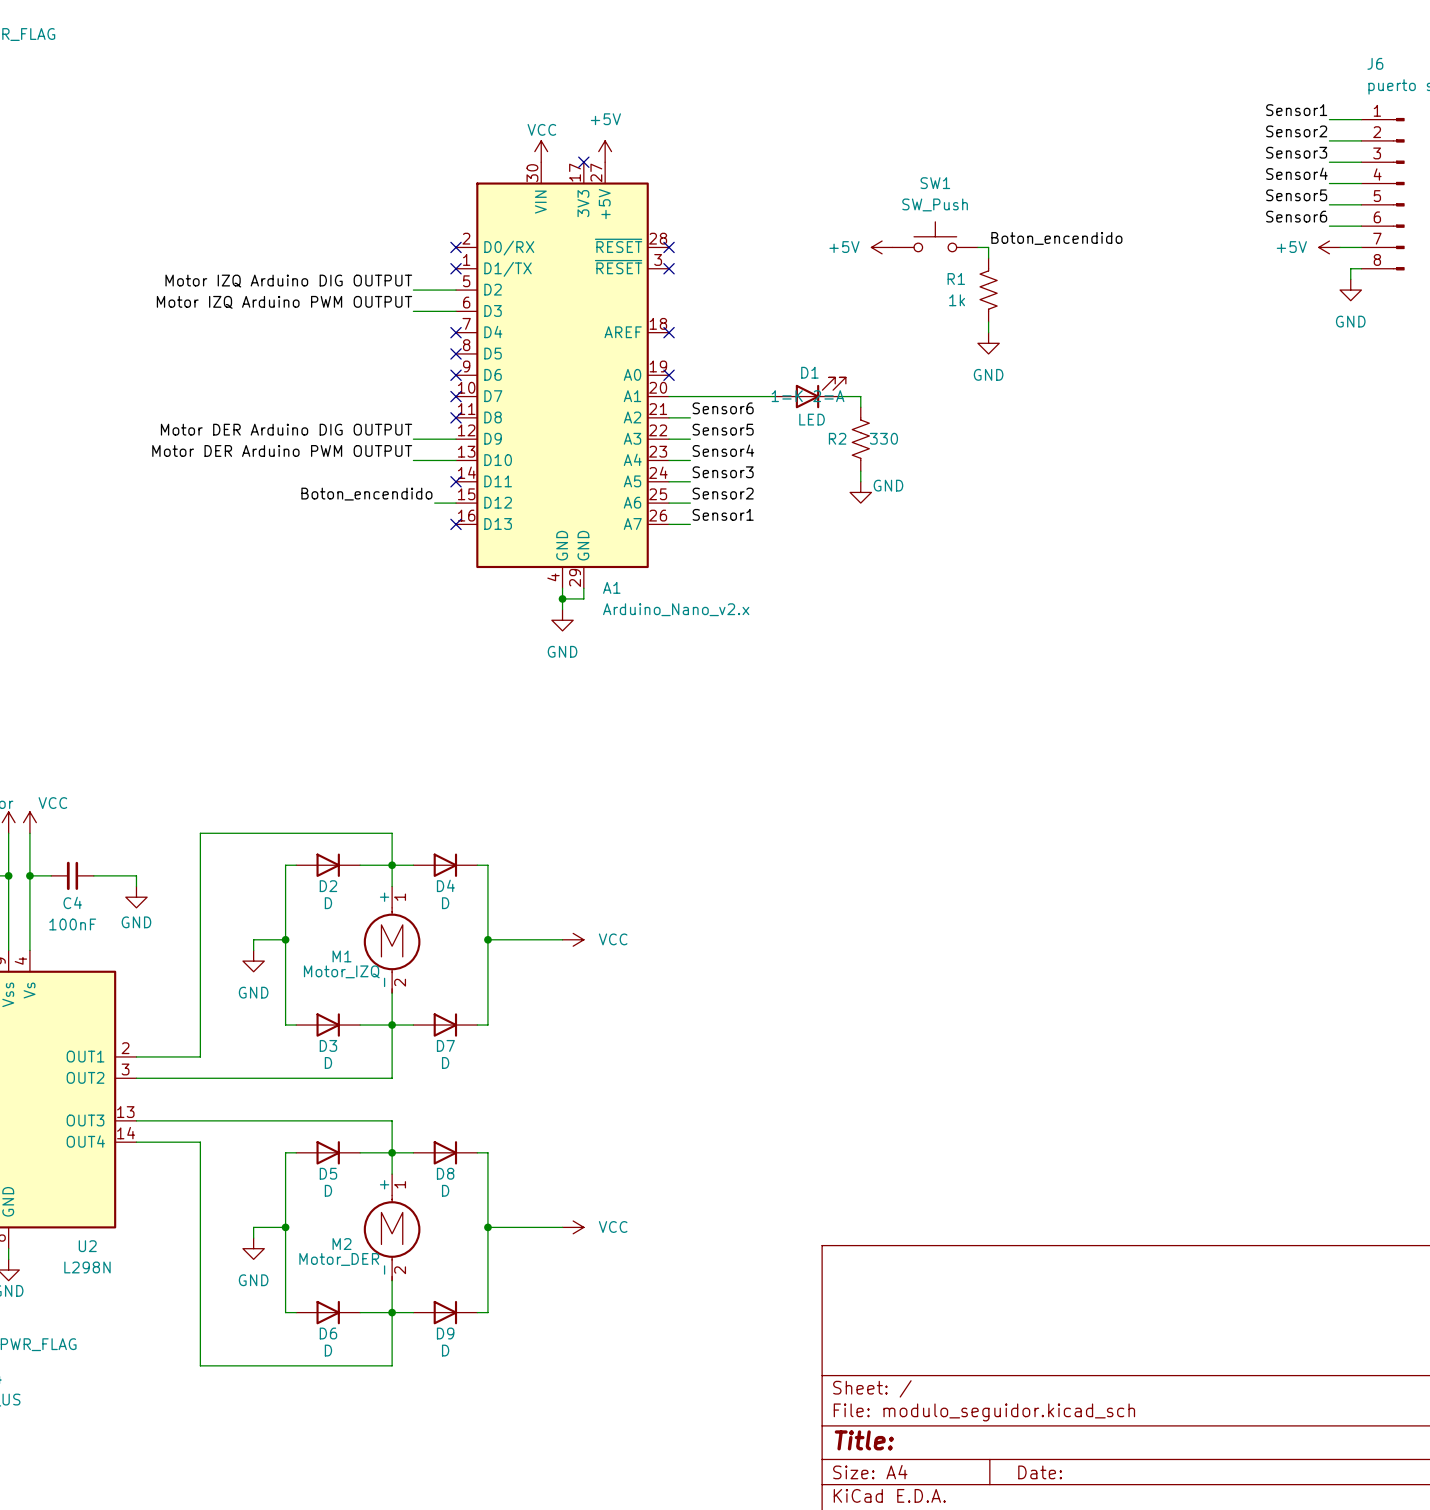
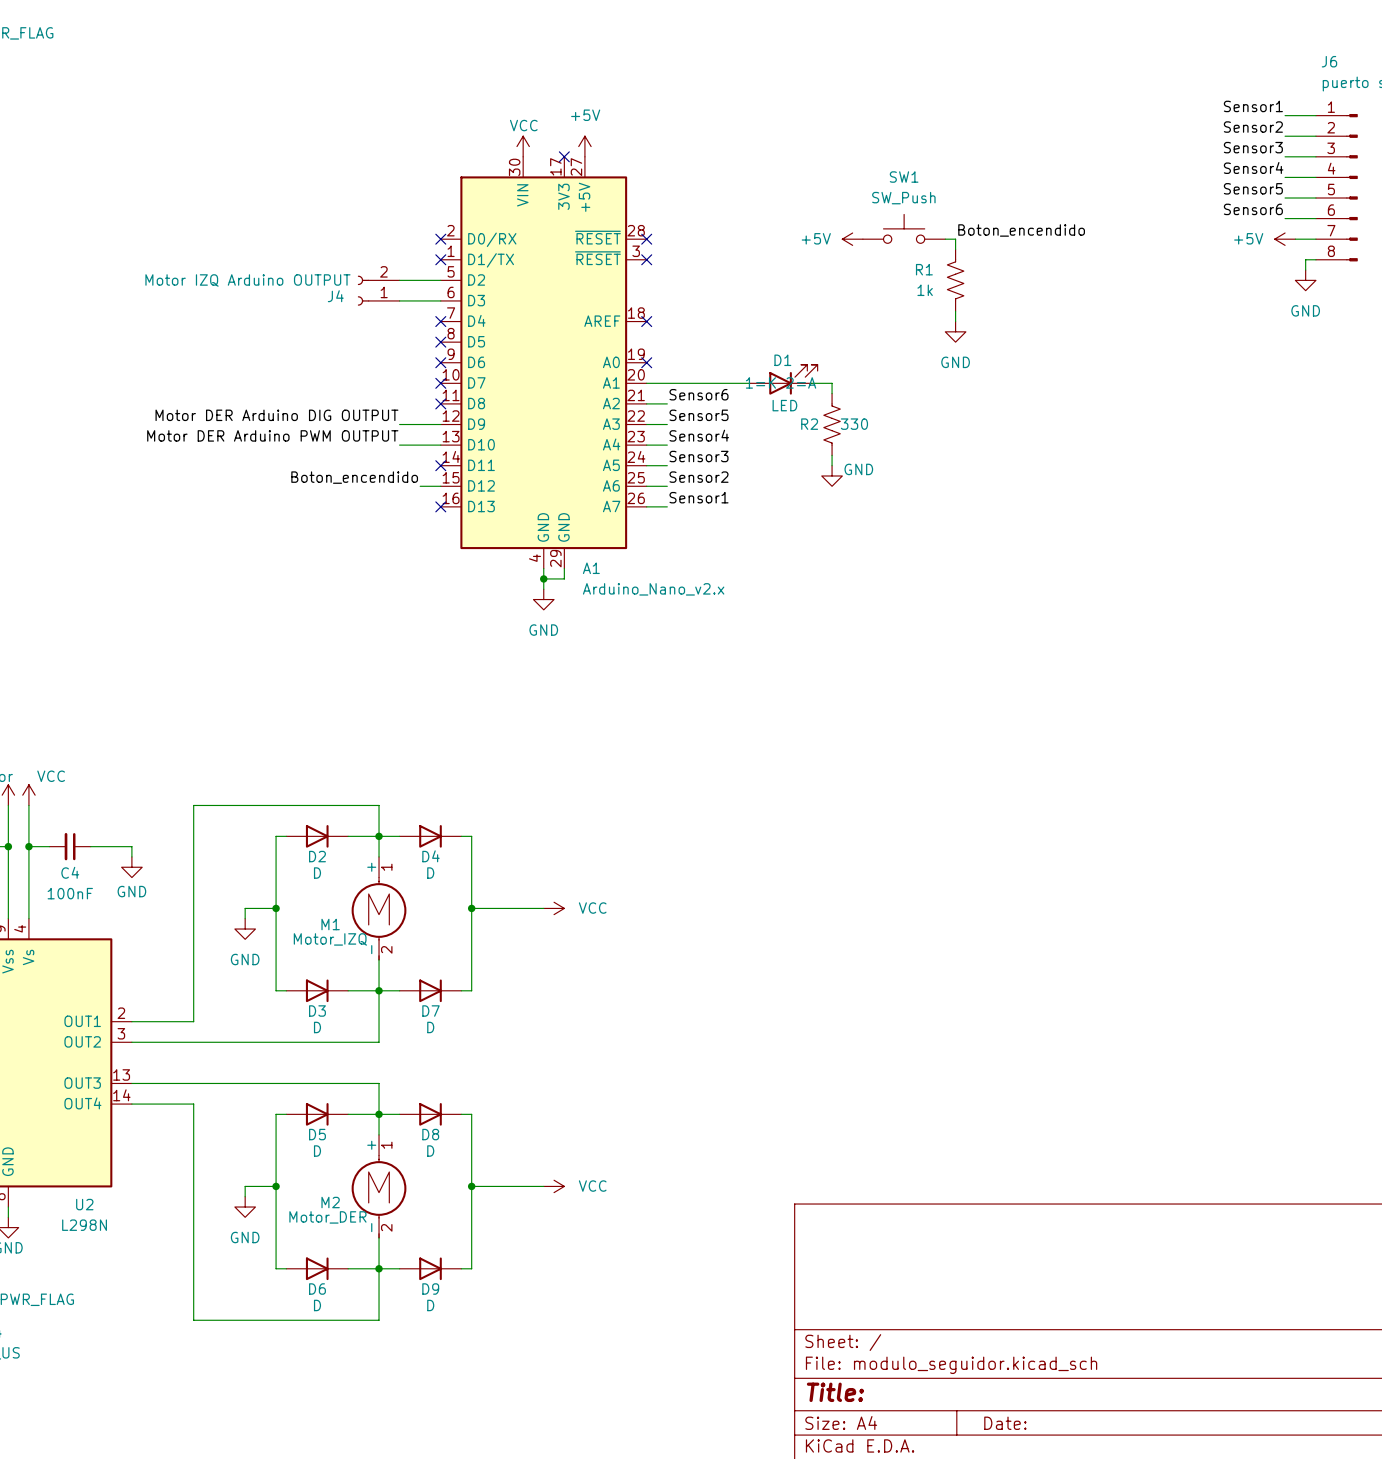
label: Motor IZQ Arduino DIG OUTPUT (288, 281) -> none
J4: none -> Motor IZQ Arduino OUTPUT (378, 290)
label: Motor IZQ Arduino PWM OUTPUT (284, 302) -> none

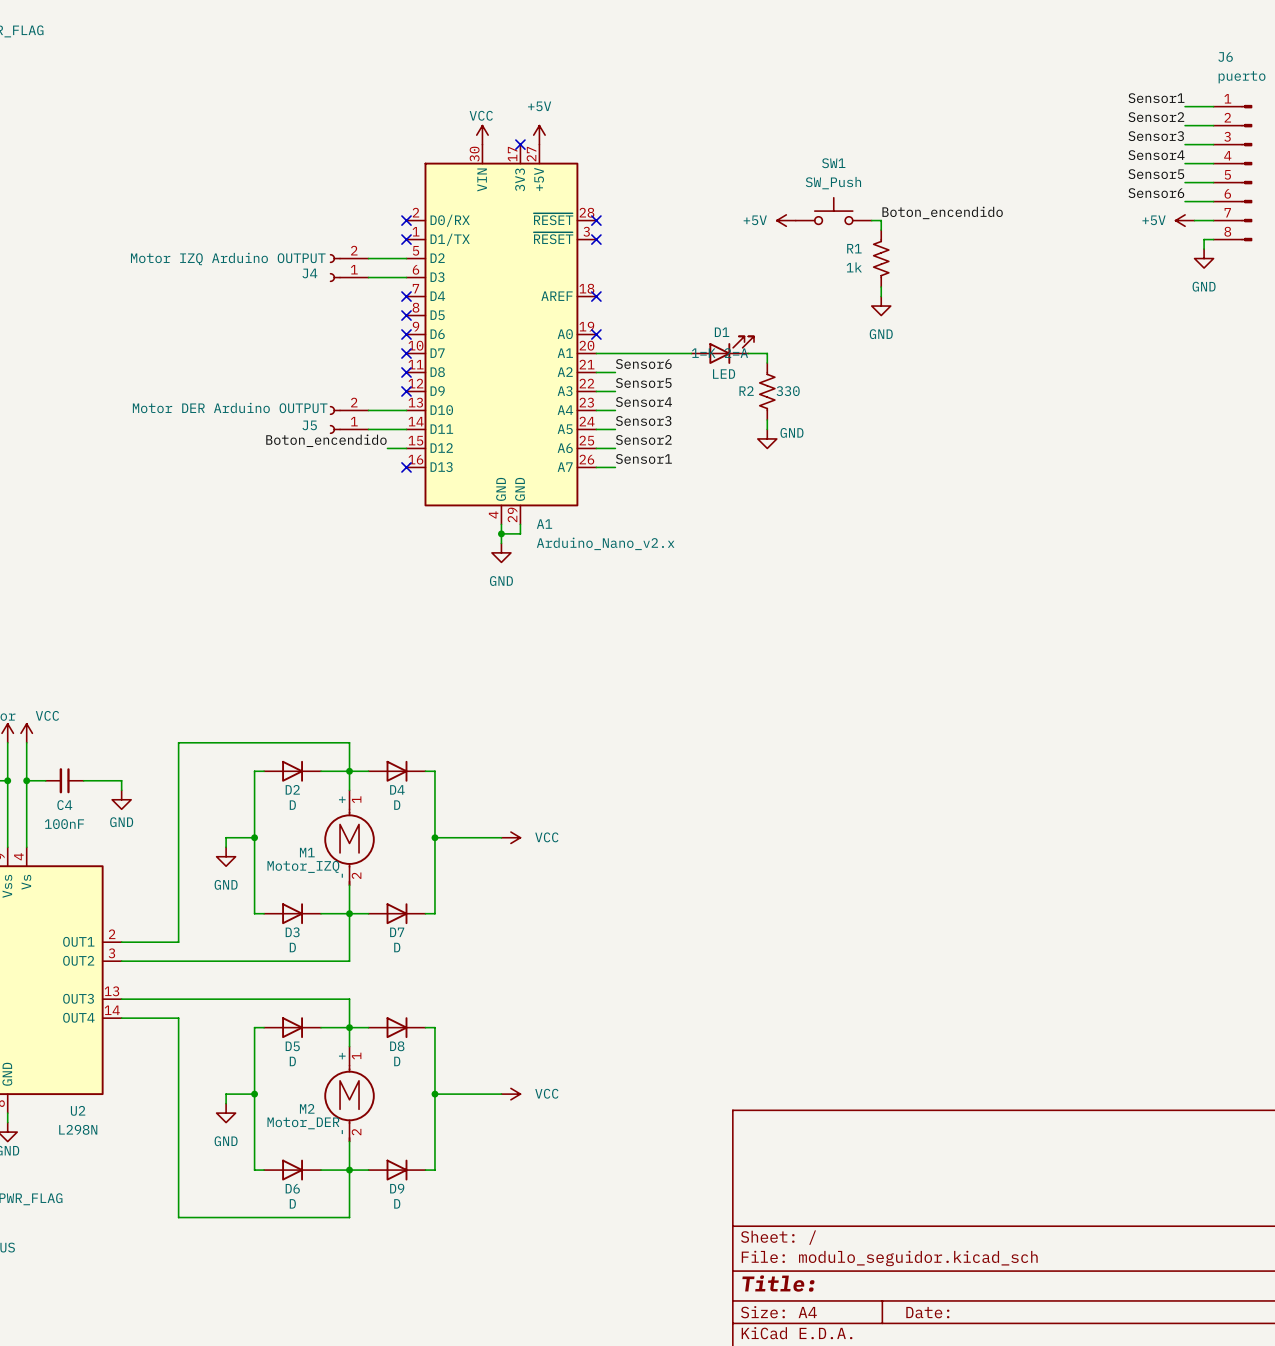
label: Motor DER Arduino DIG OUTPUT (276, 415) -> none
wire: (399, 424) (440, 424) -> (368, 429) (406, 429)
label: Motor DER Arduino PWM OUTPUT (272, 435) -> none
J5: none -> Motor DER Arduino OUTPUT (349, 419)
no-connect mark position: (440, 465) -> (406, 391)

